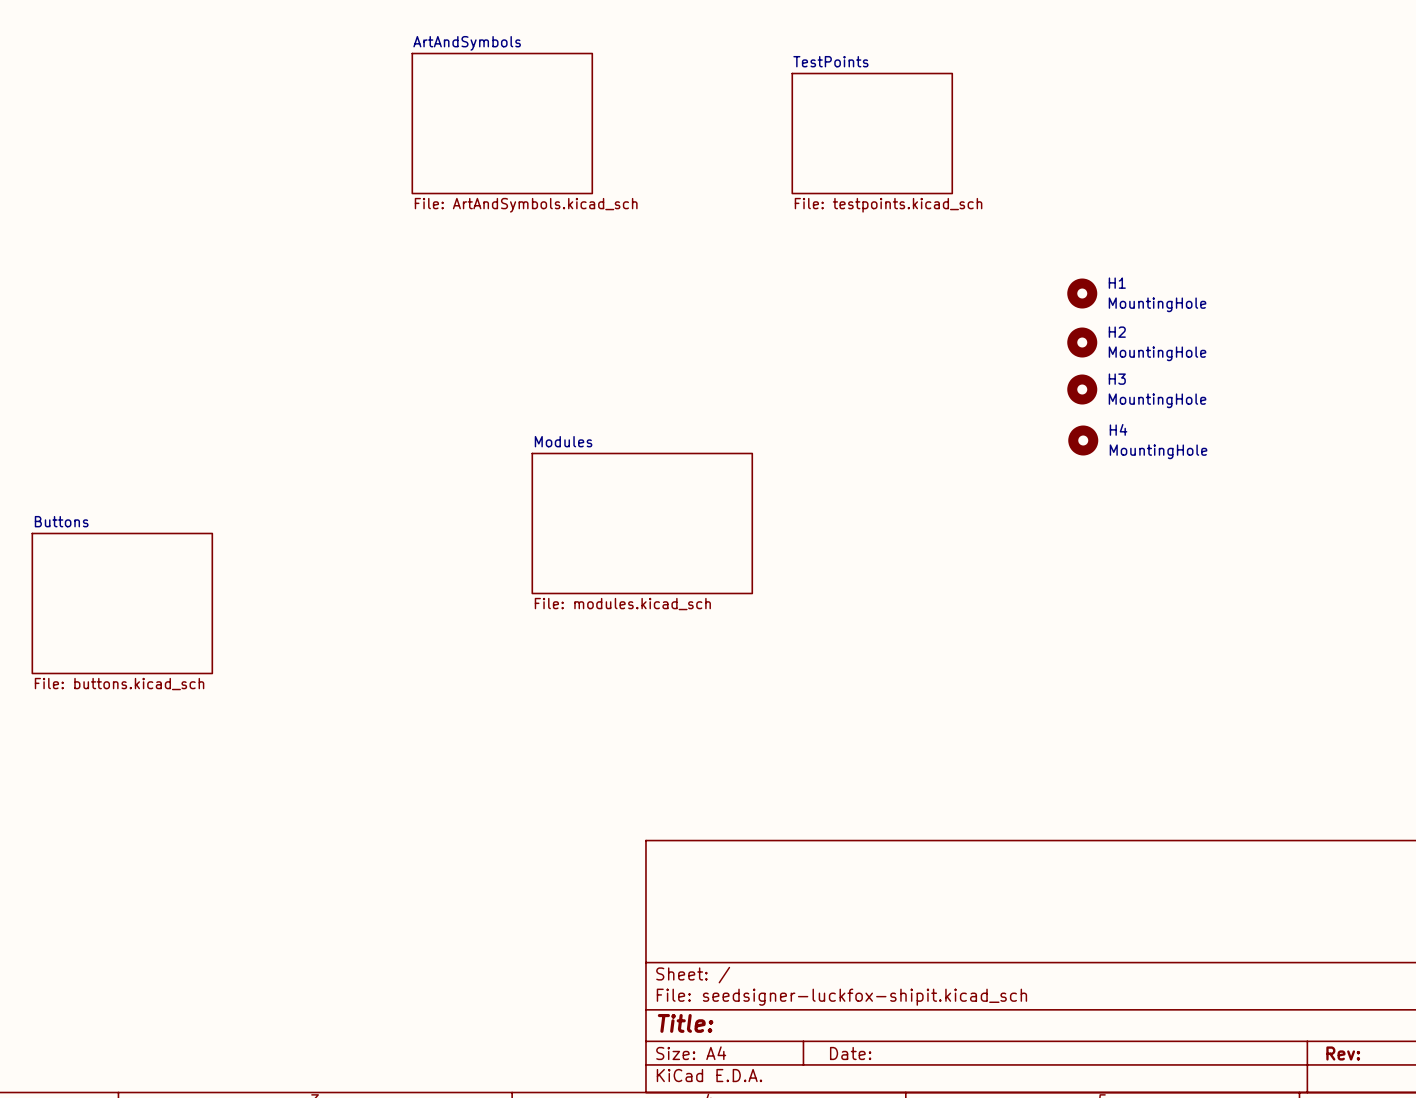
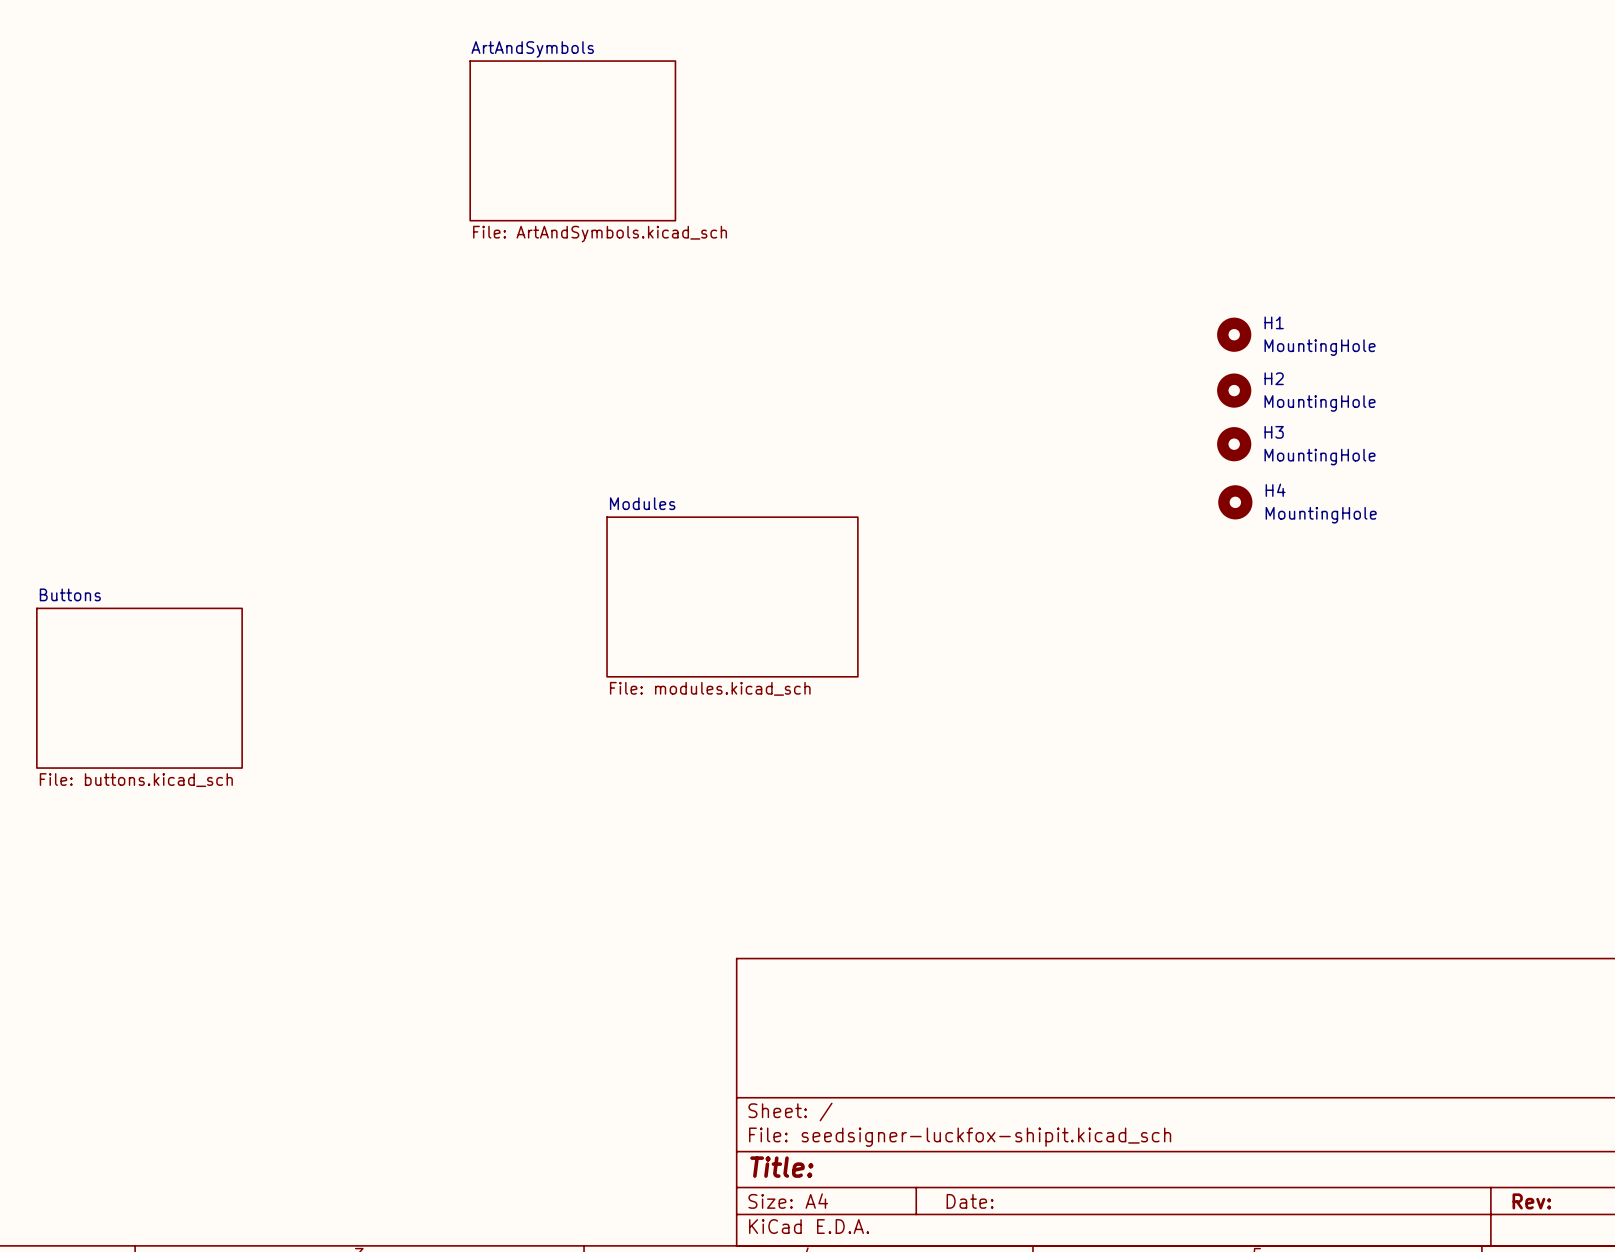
sheet TestPoints: File: testpoints.kicad_sch (872, 133) -> none

